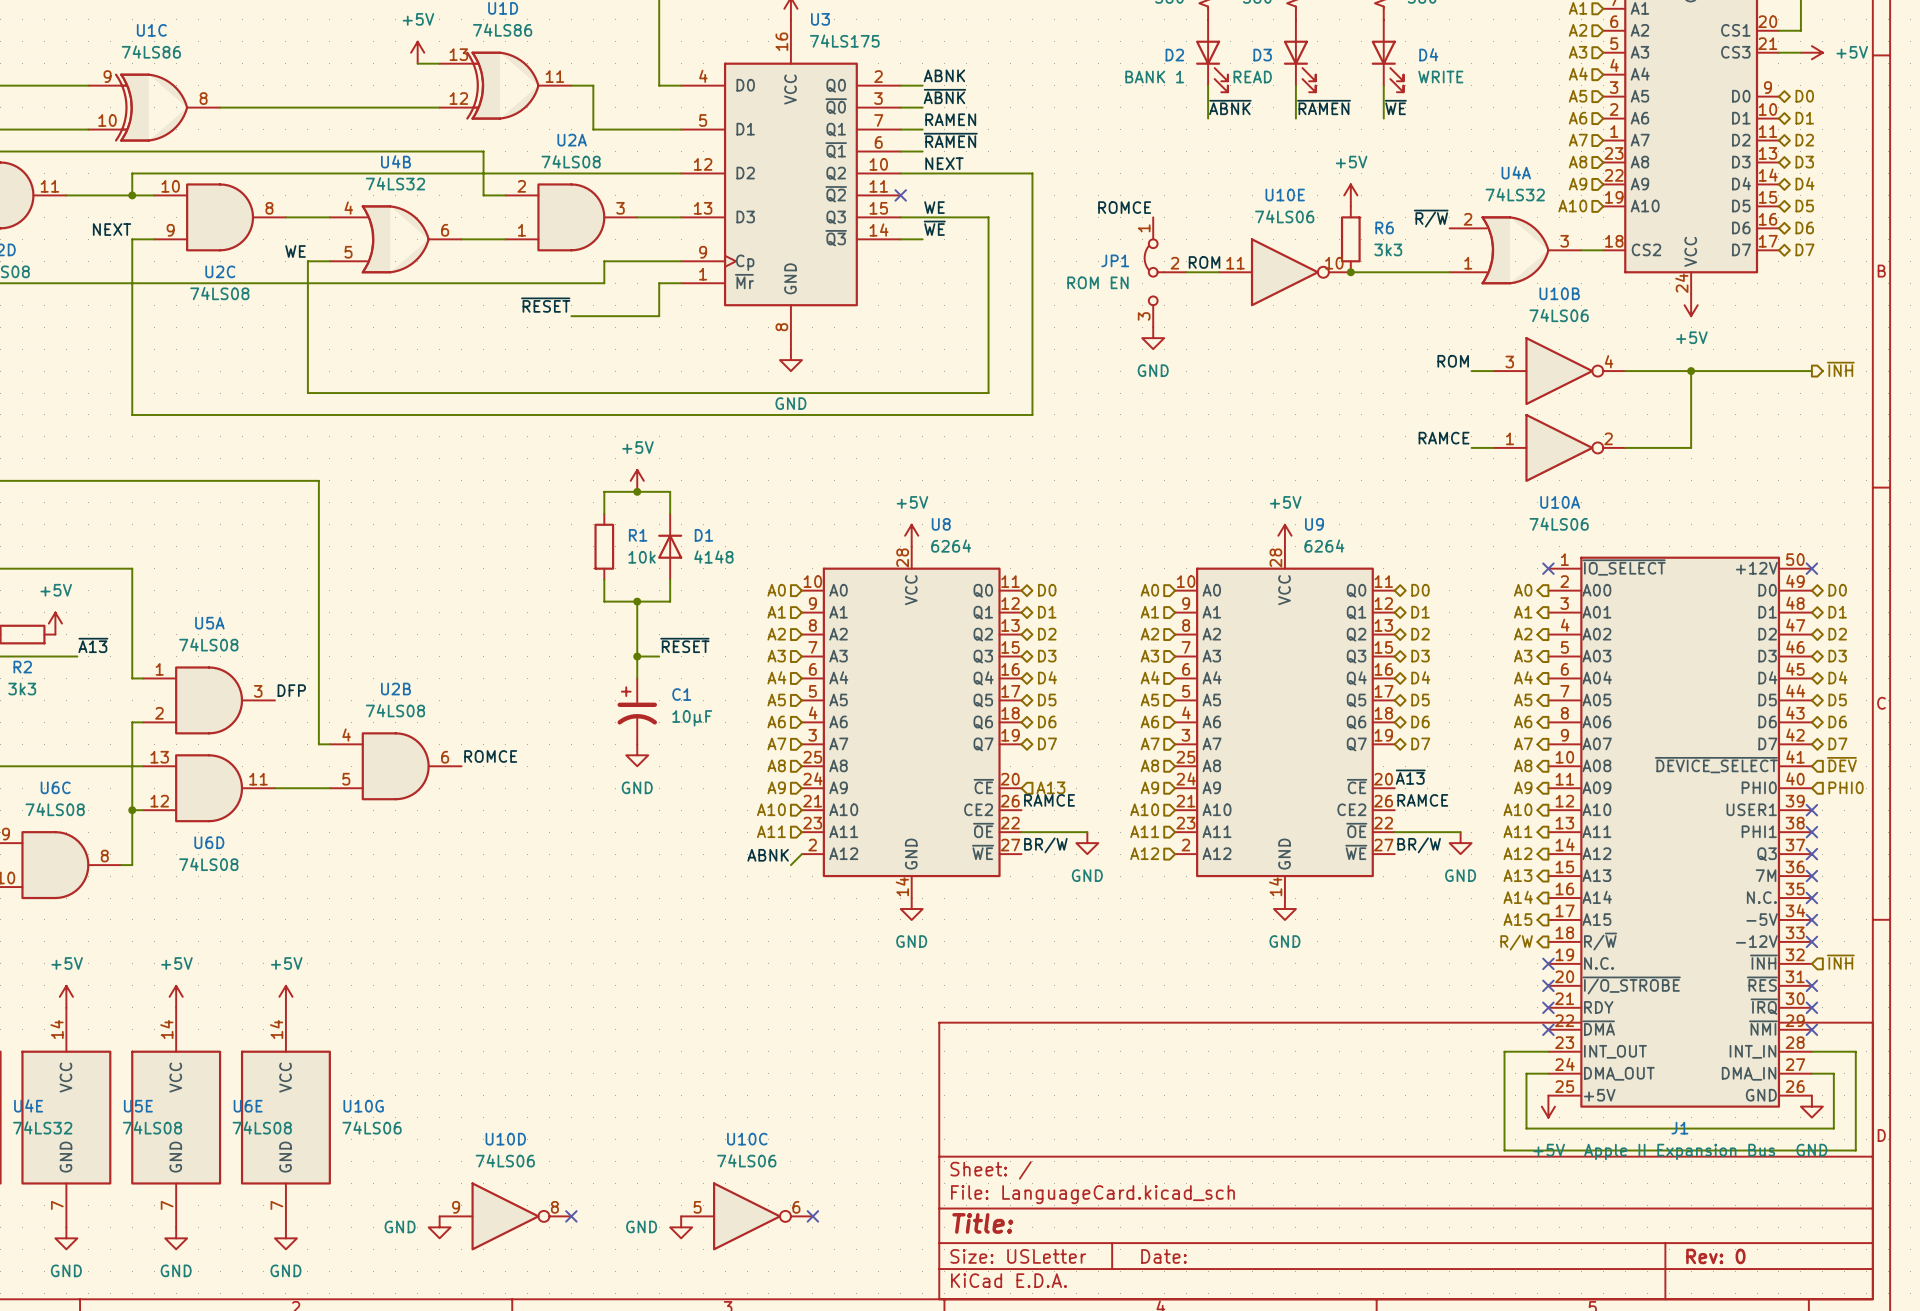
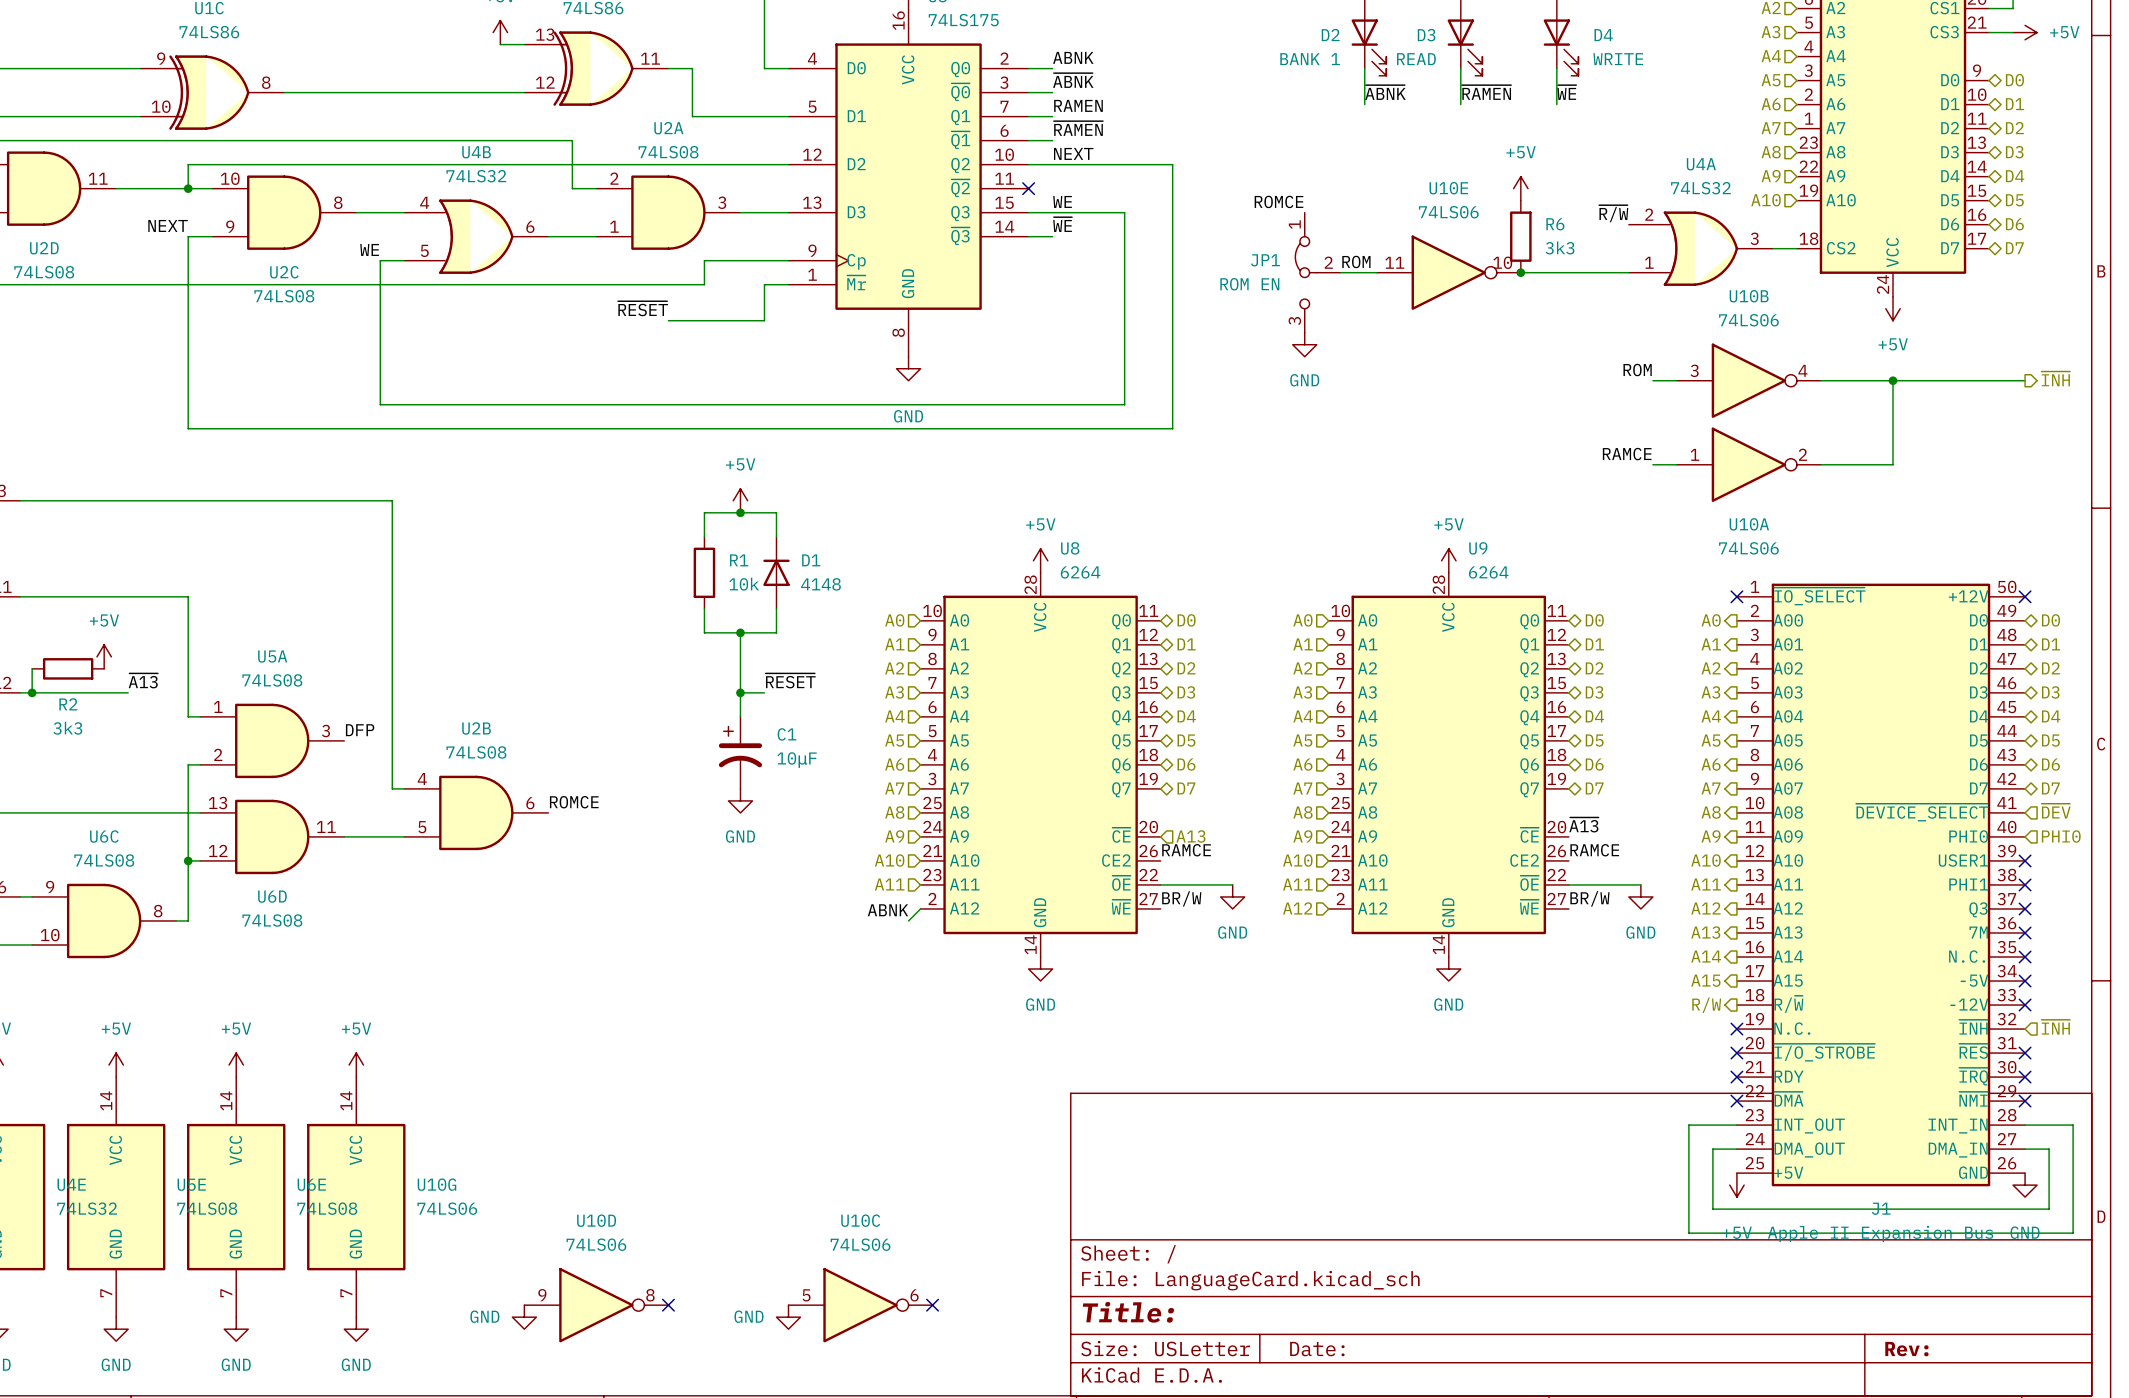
title block: Rev: 0 (1715, 1256) -> Rev: (1906, 1349)

